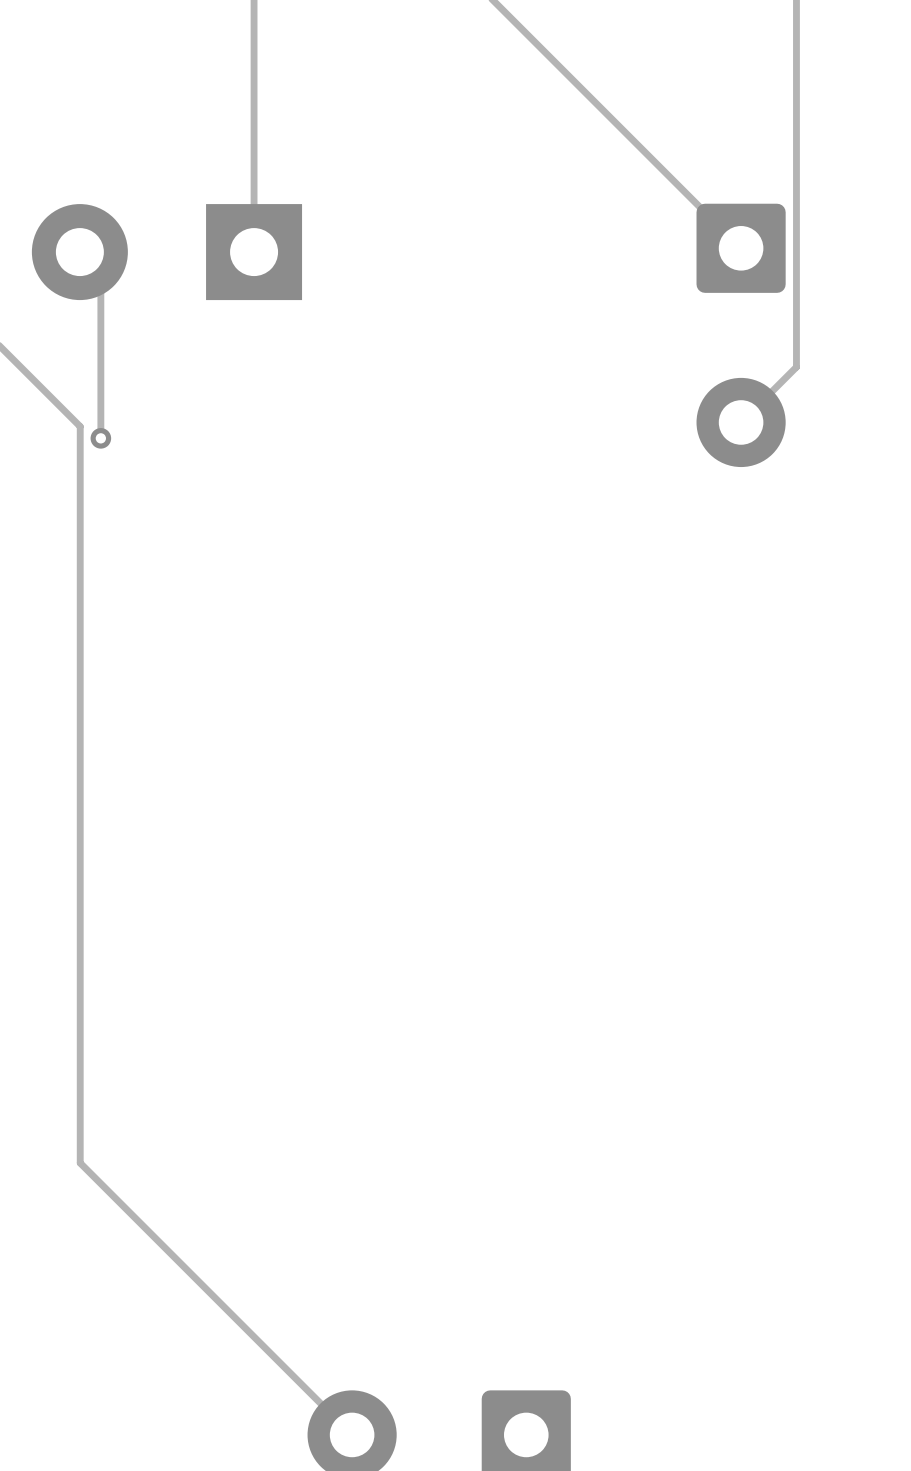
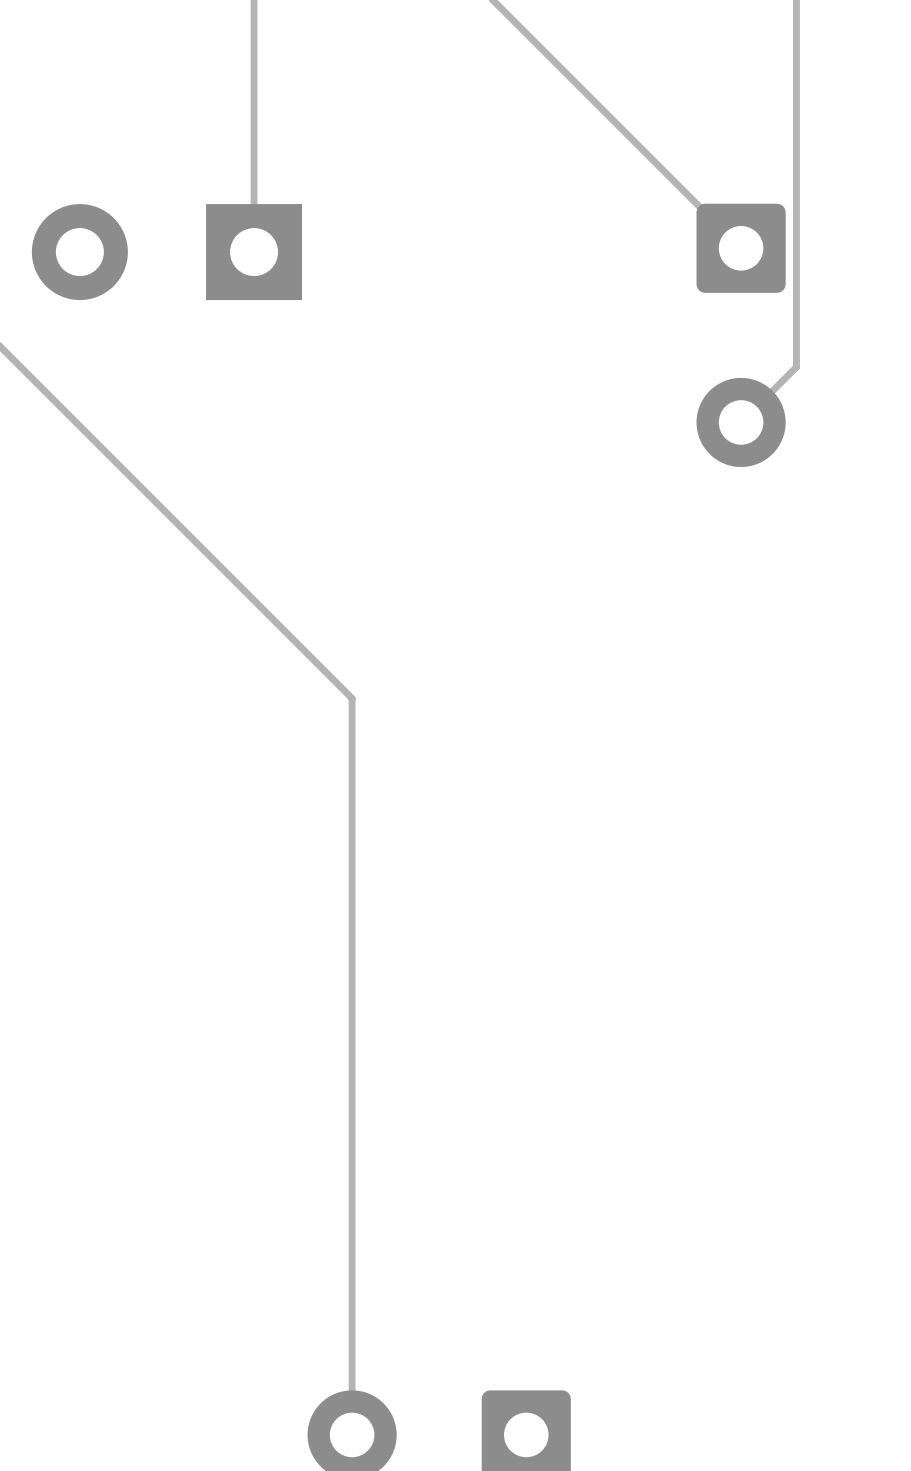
track: (79, 252) (100, 273) (100, 438) -> none
track: (80, 426) (80, 1163) (352, 1434) -> (80, 426) (352, 698) (352, 1434)
via: (100, 438) -> none

